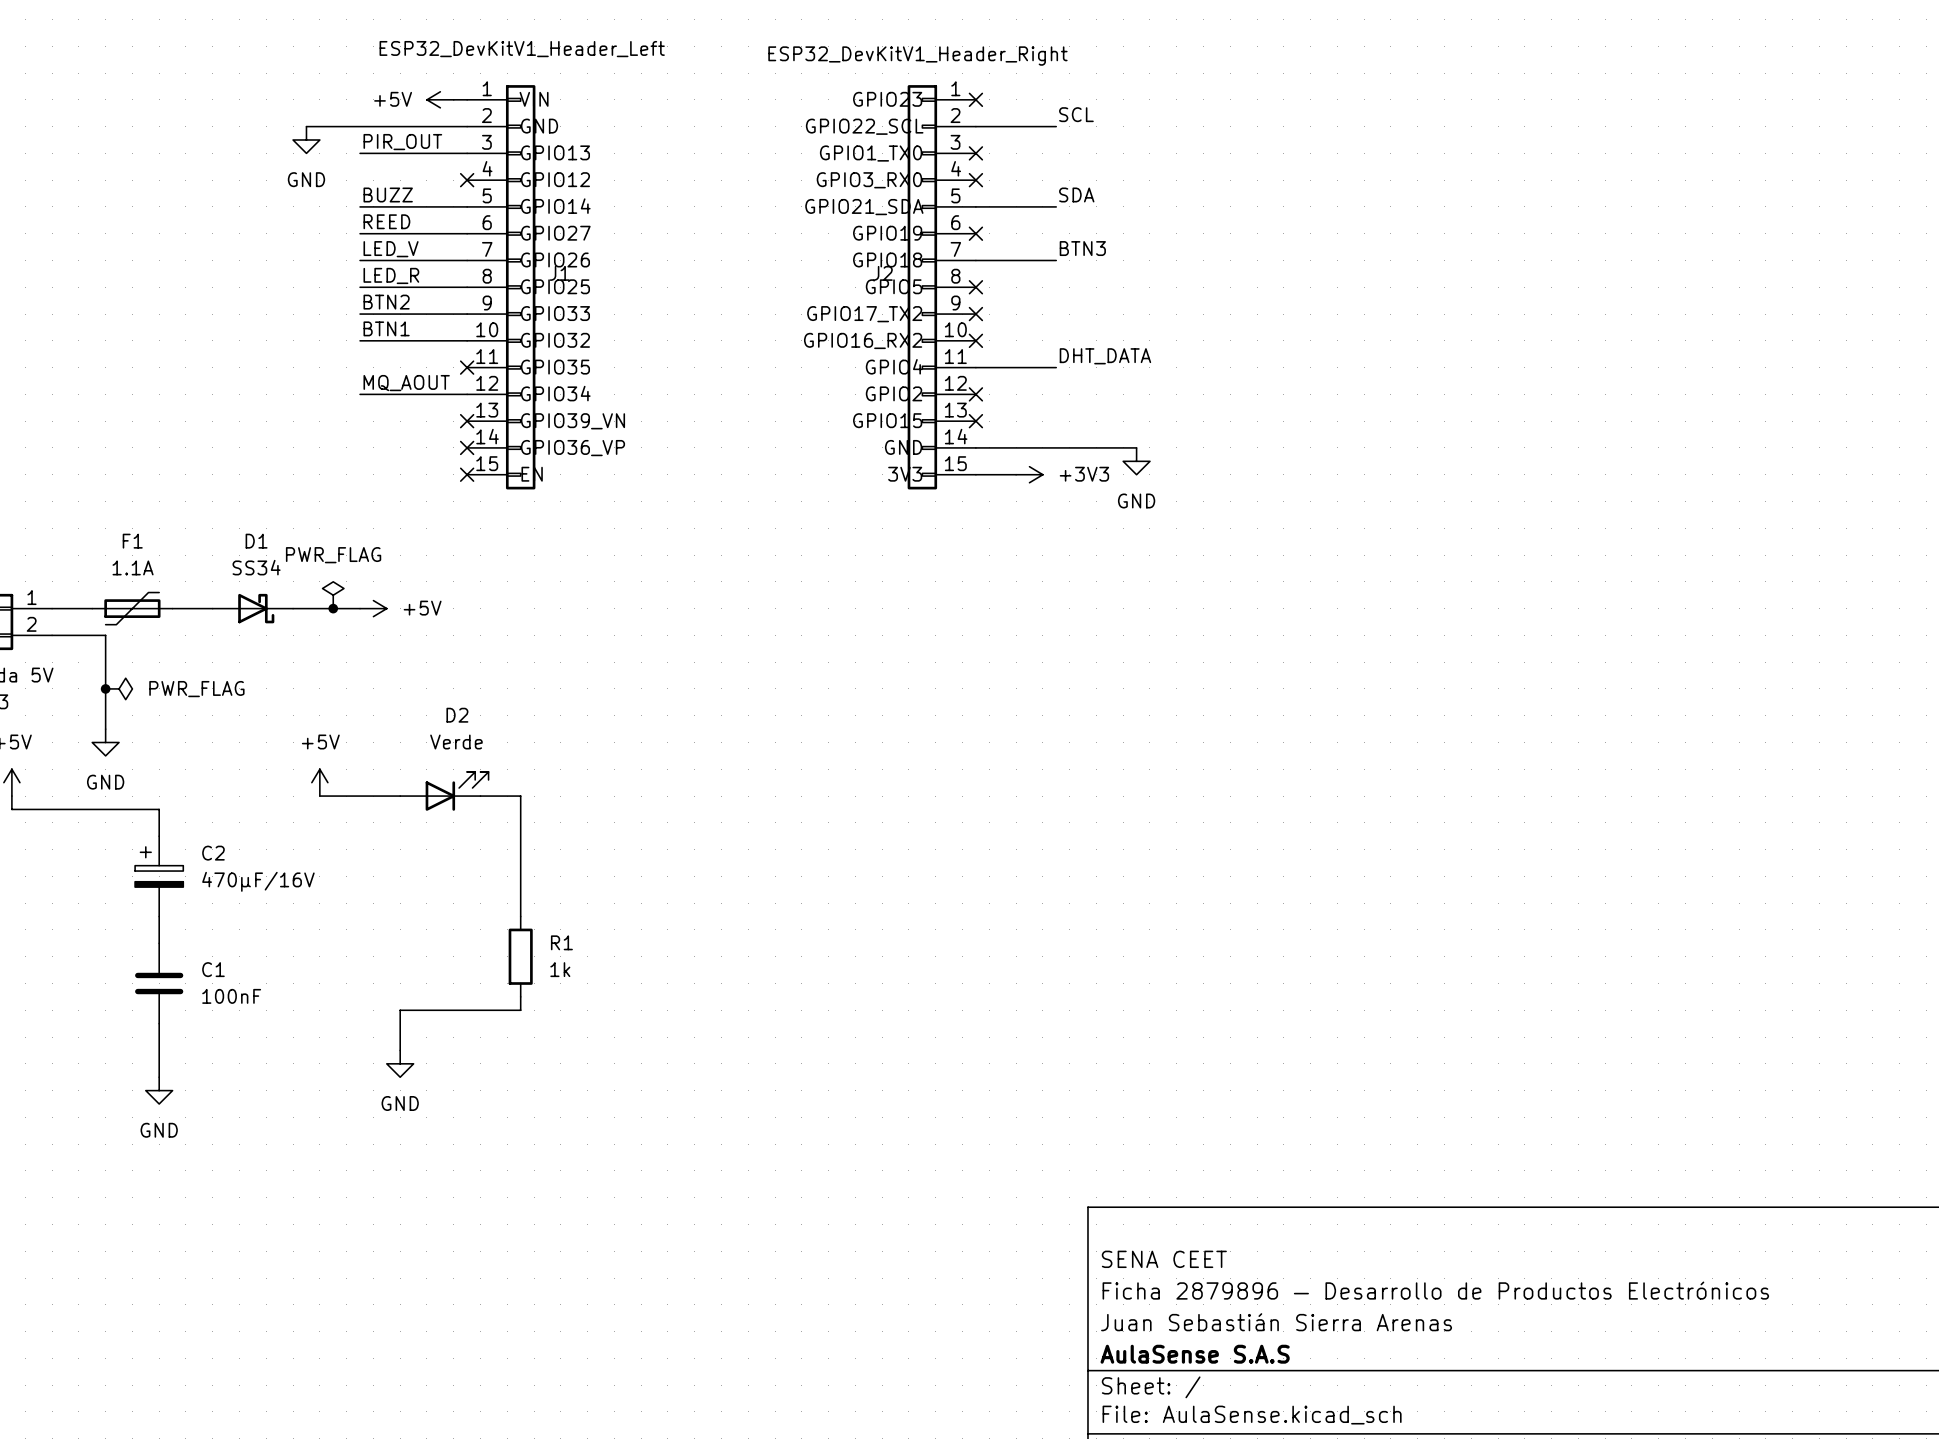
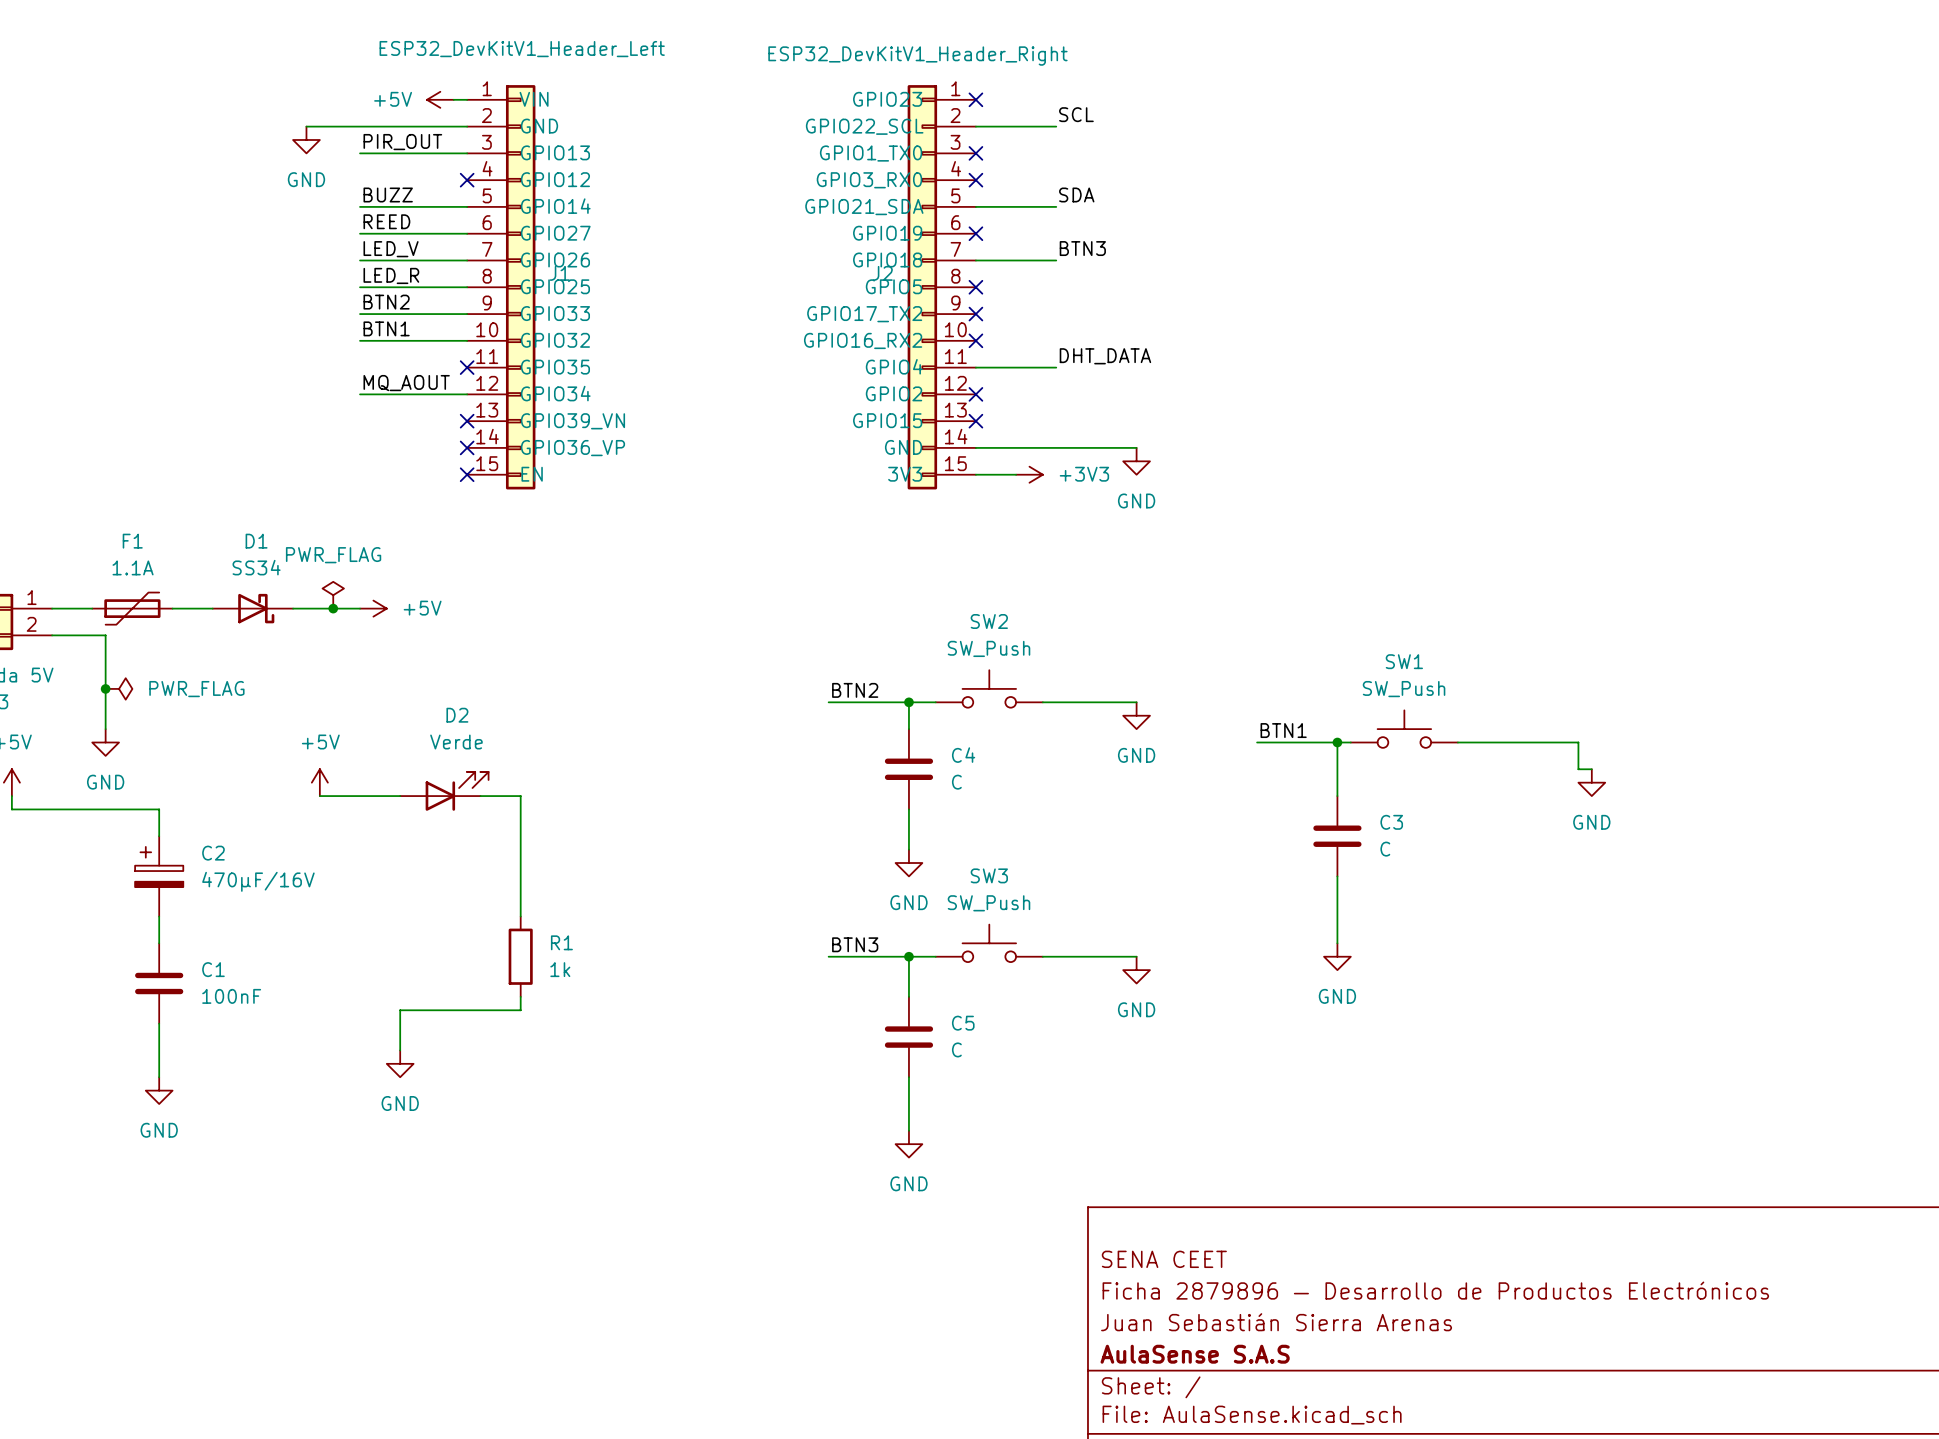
SW2: none -> SW_Push (989, 688)
label: none -> BTN2 (855, 690)
wire: none -> (828, 702) (935, 702)
wire: none -> (908, 702) (908, 729)
junction: none -> (908, 702)
wire: none -> (1042, 702) (1136, 702)
power symbol: none -> GND (1136, 715)
SW1: none -> SW_Push (1404, 729)
label: none -> BTN1 (1283, 730)
wire: none -> (1257, 742) (1350, 742)
wire: none -> (1337, 742) (1337, 796)
junction: none -> (1337, 742)
wire: none -> (1457, 742) (1578, 742) (1578, 769) (1591, 769)
C4: none -> C (908, 769)
power symbol: none -> GND (1591, 782)
wire: none -> (908, 809) (908, 849)
C3: none -> C (1337, 836)
power symbol: none -> GND (908, 863)
wire: none -> (1337, 876) (1337, 943)
SW3: none -> SW_Push (989, 943)
label: none -> BTN3 (855, 944)
wire: none -> (828, 956) (935, 956)
wire: none -> (908, 956) (908, 996)
junction: none -> (908, 956)
wire: none -> (1042, 956) (1136, 956)
power symbol: none -> GND (1337, 956)
power symbol: none -> GND (1136, 970)
C5: none -> C (908, 1037)
wire: none -> (908, 1077) (908, 1130)
power symbol: none -> GND (908, 1144)

